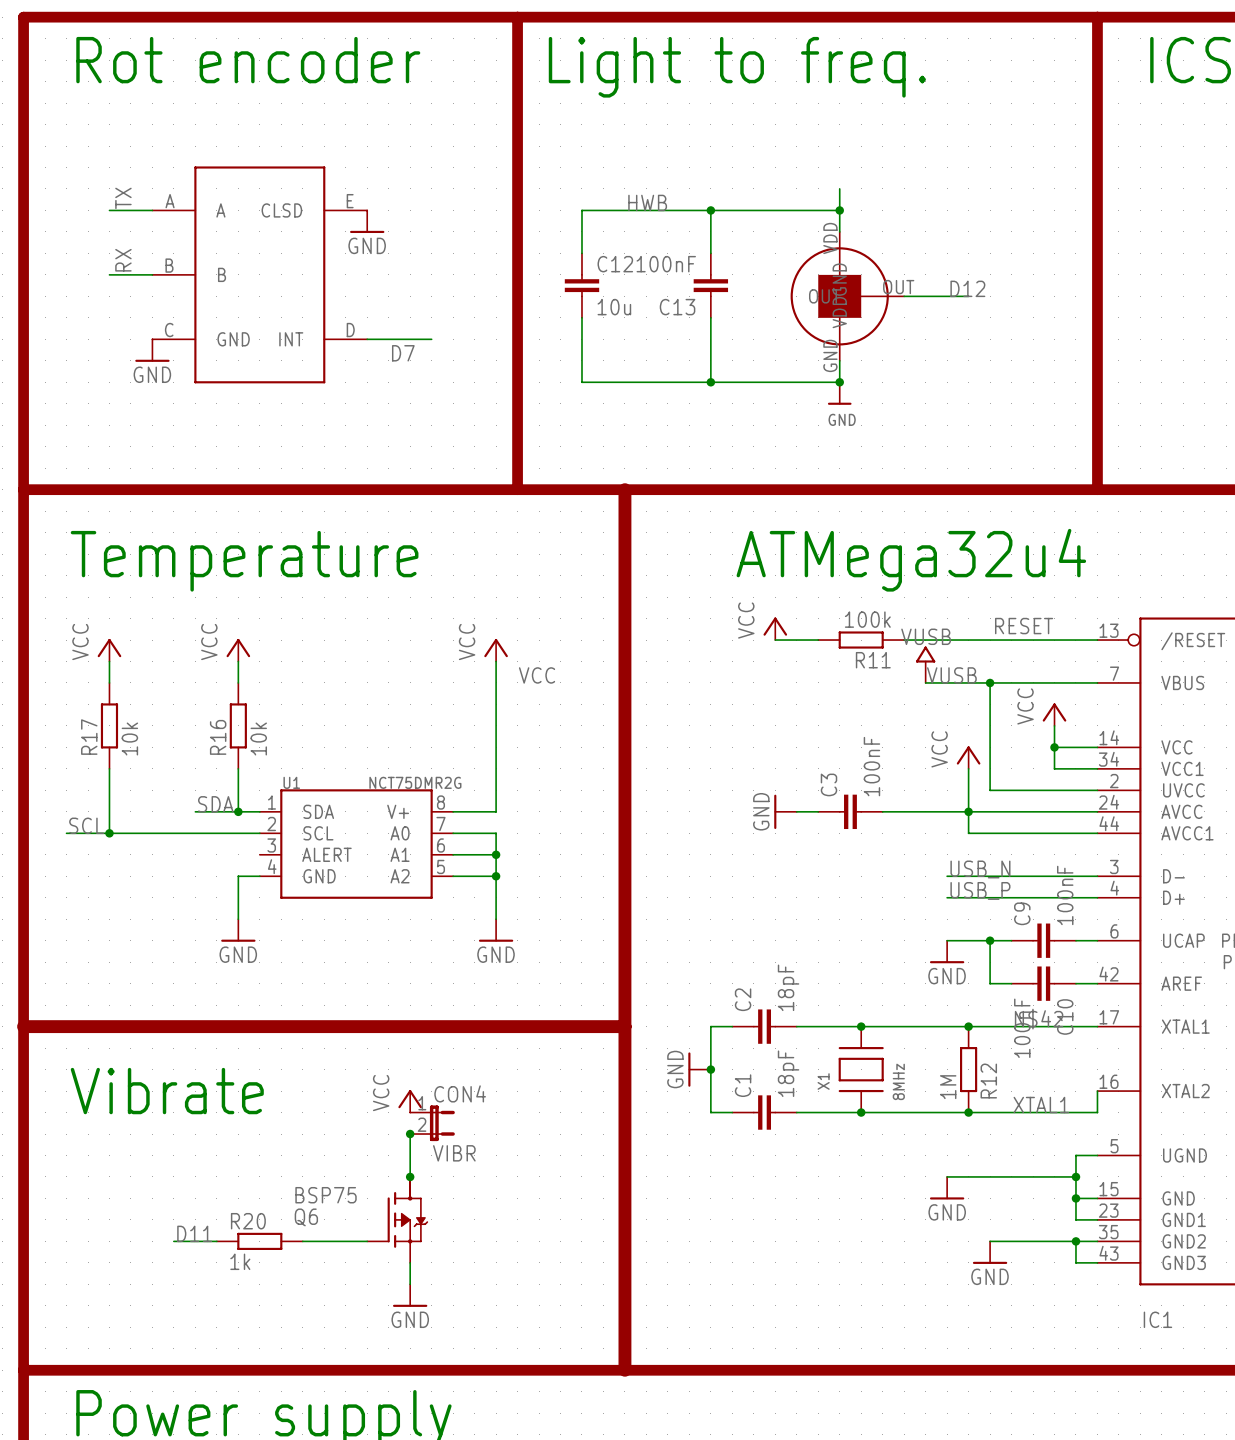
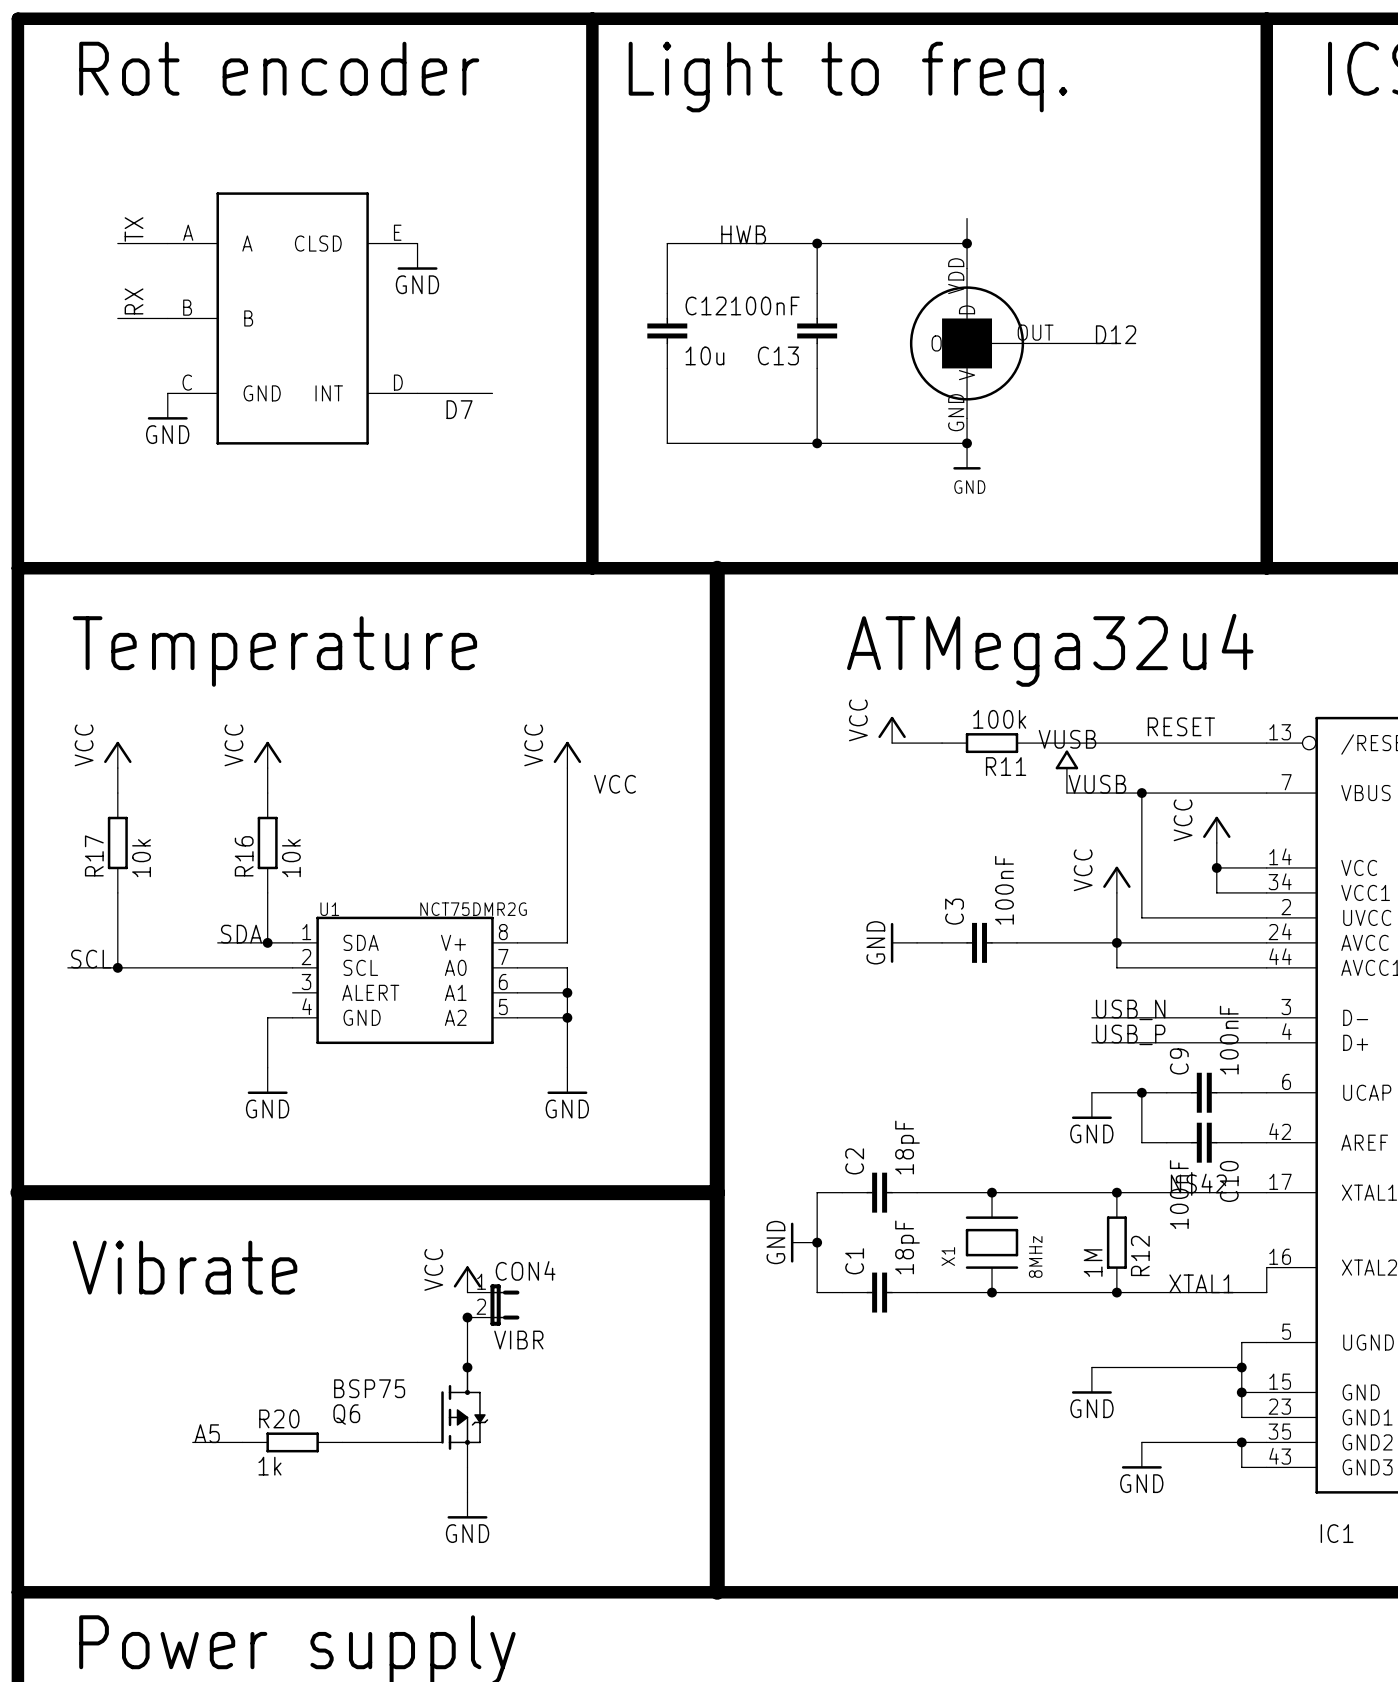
label: D11 (194, 1233) -> A5 (207, 1433)

